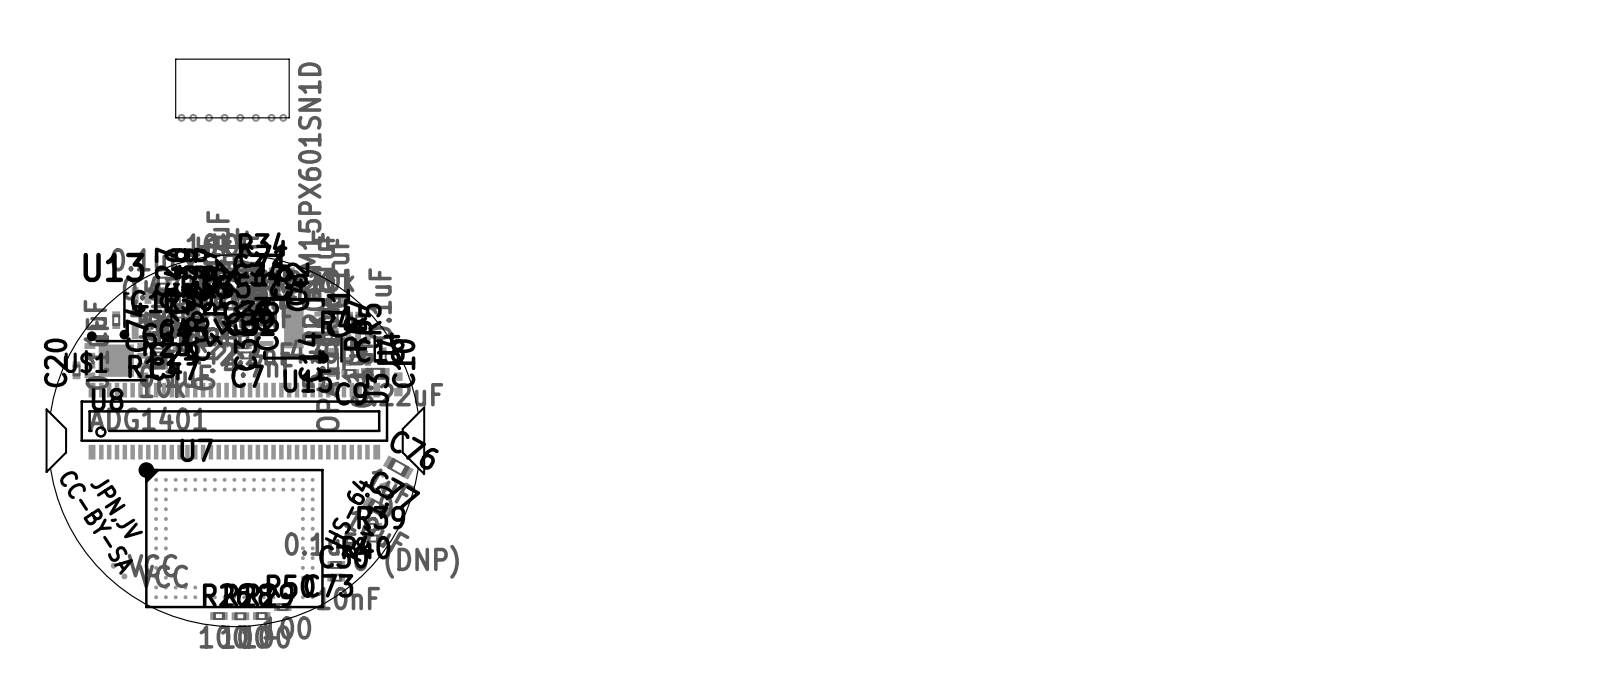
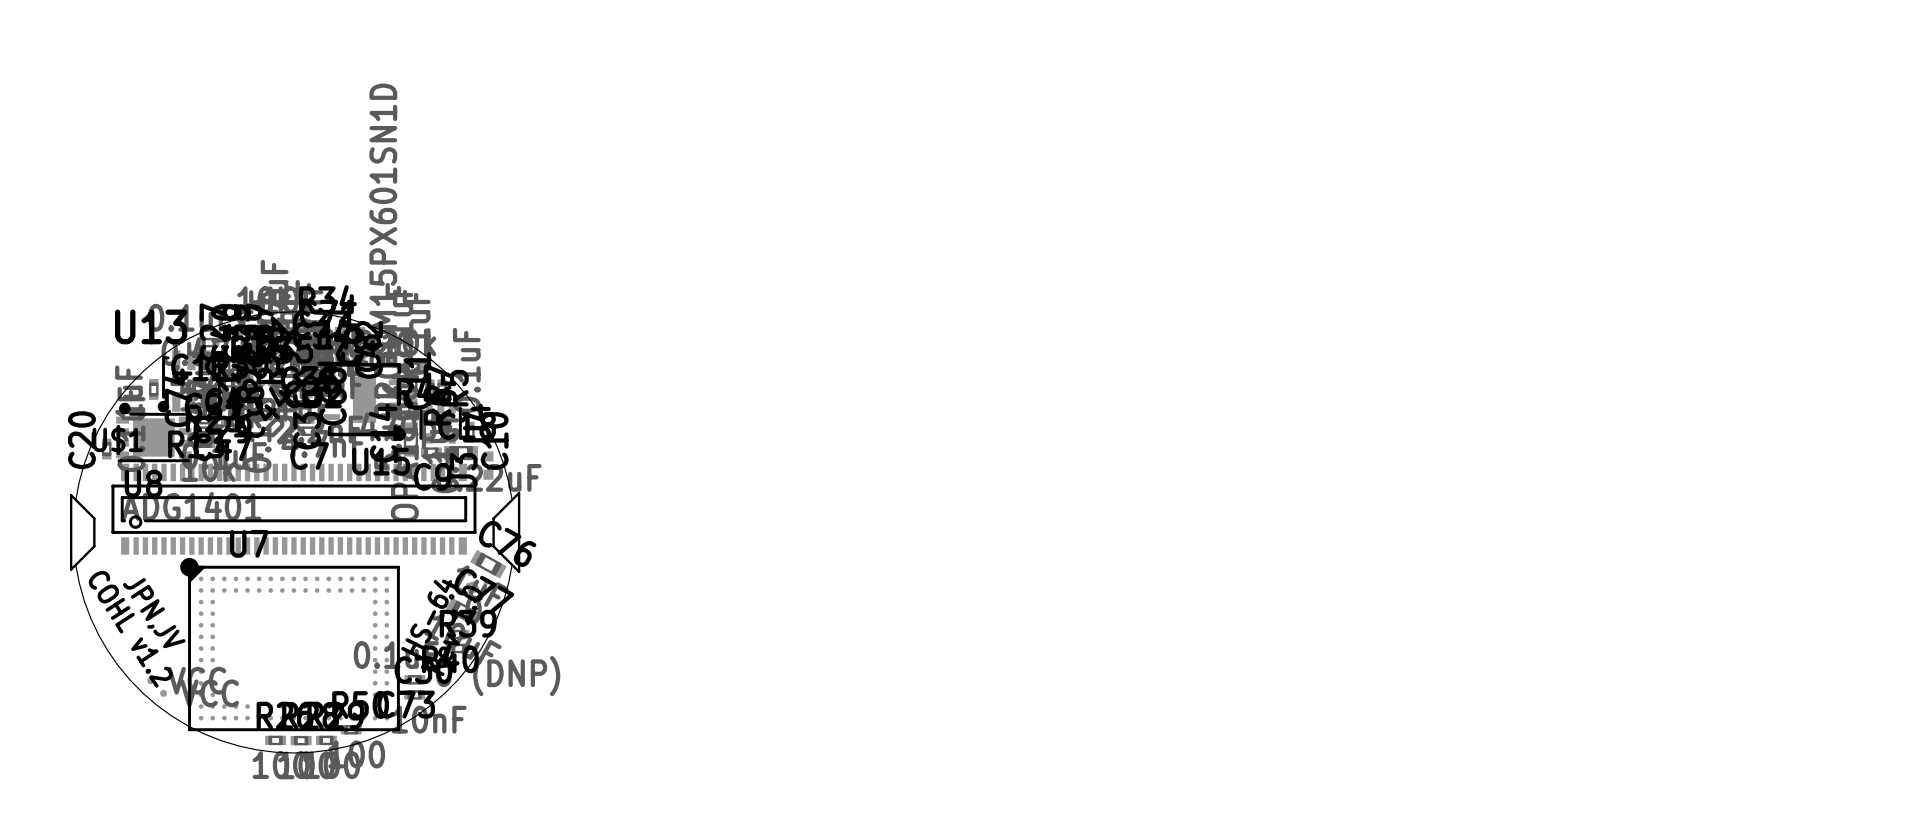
board edge: (289, 59) (289, 117) (175, 117) (175, 59) (289, 59) -> none
part: (232, 117) -> none
text: CC-BY-SA (96, 522) -> COHL v1.2 (130, 629)

